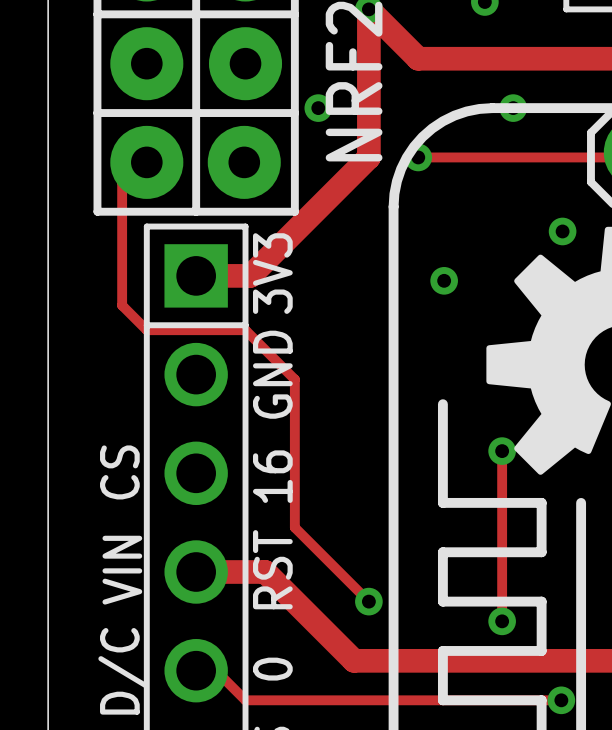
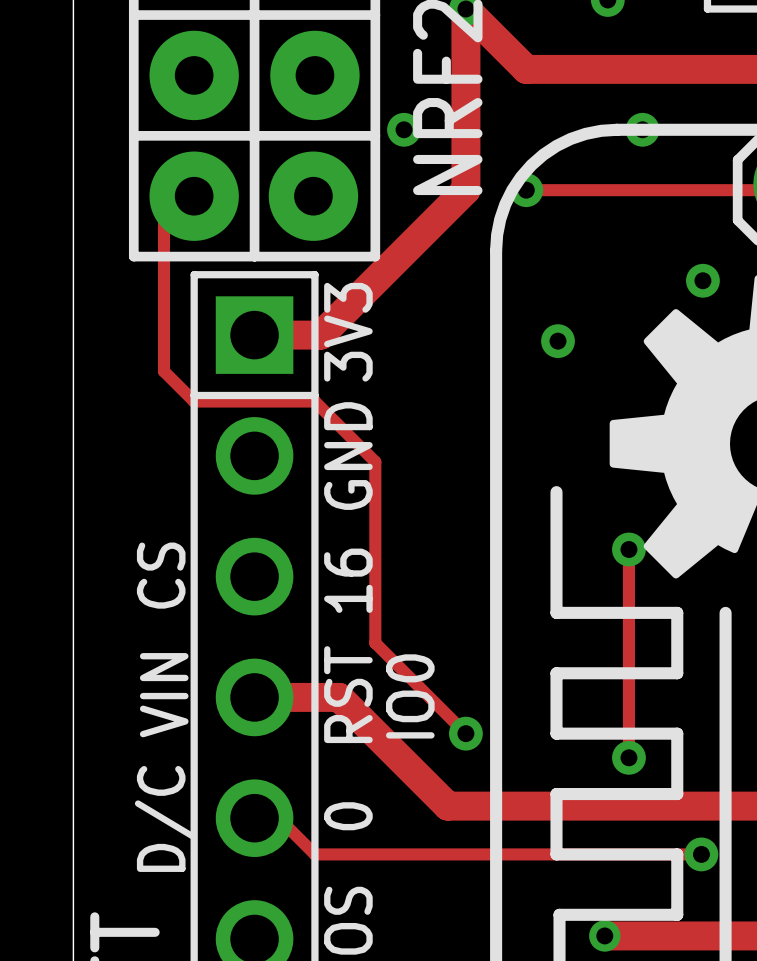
text: none -> IO0 (410, 696)

